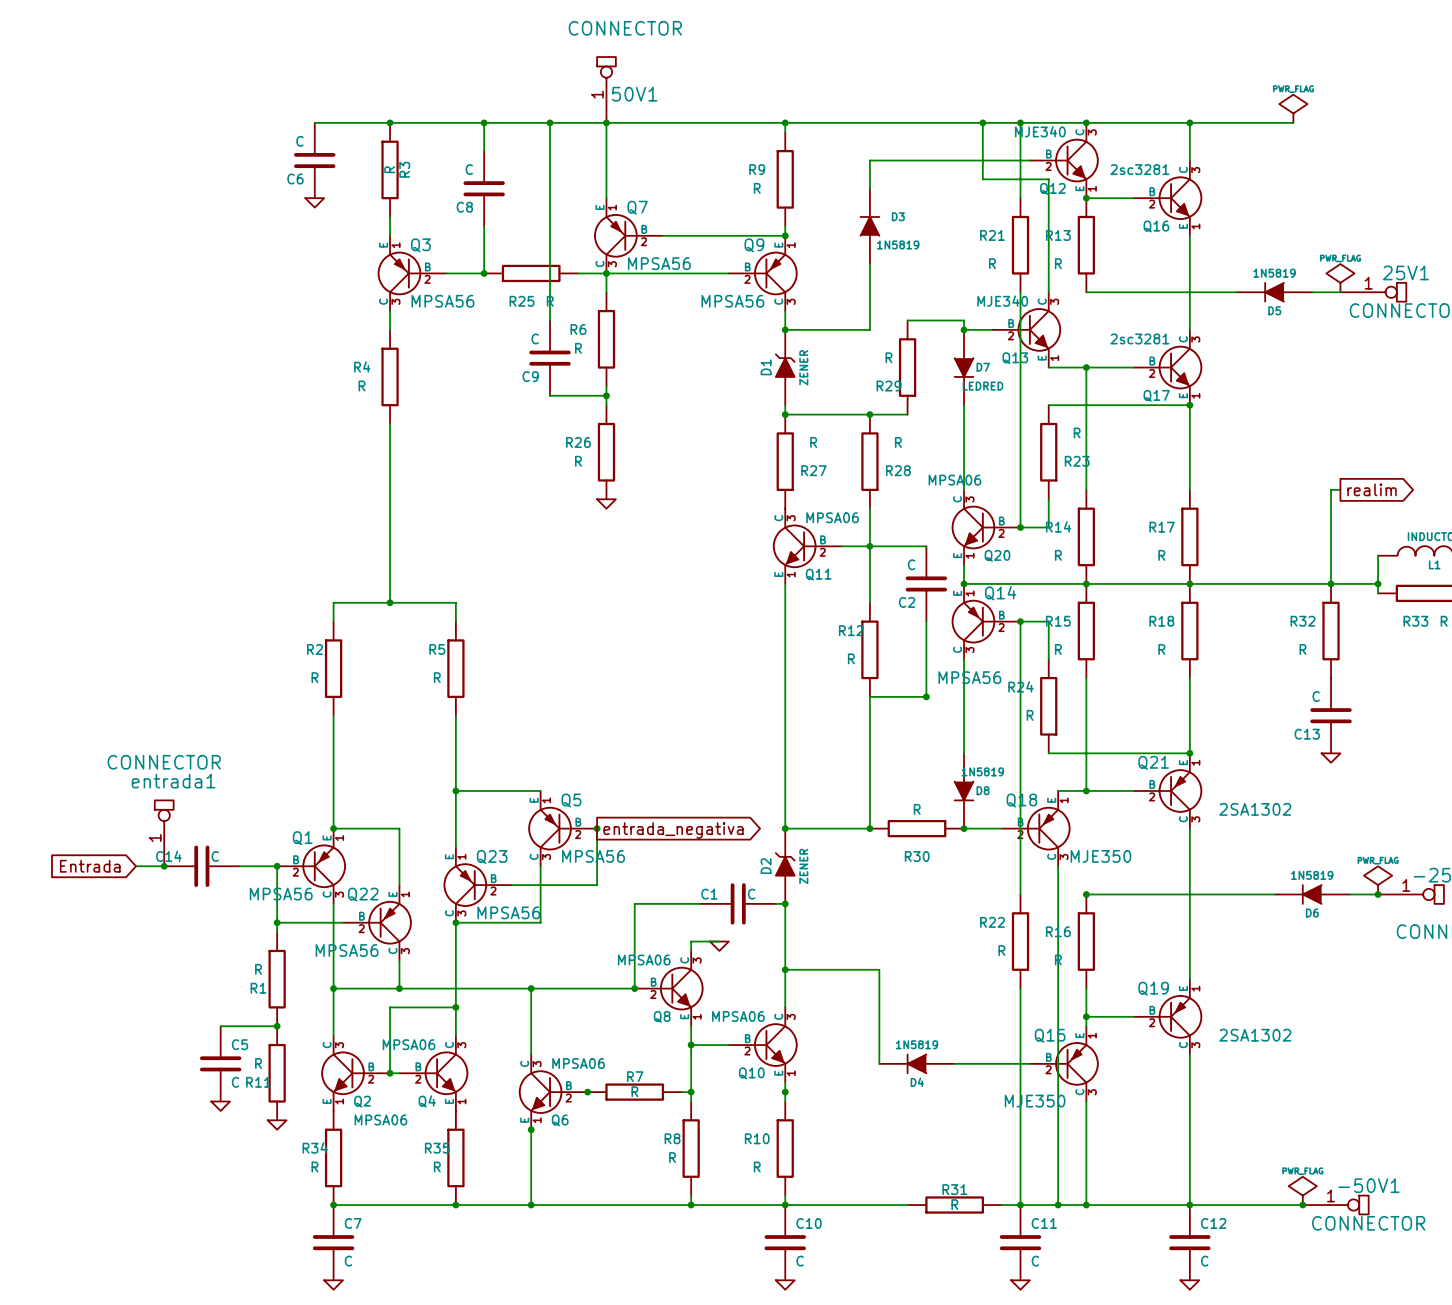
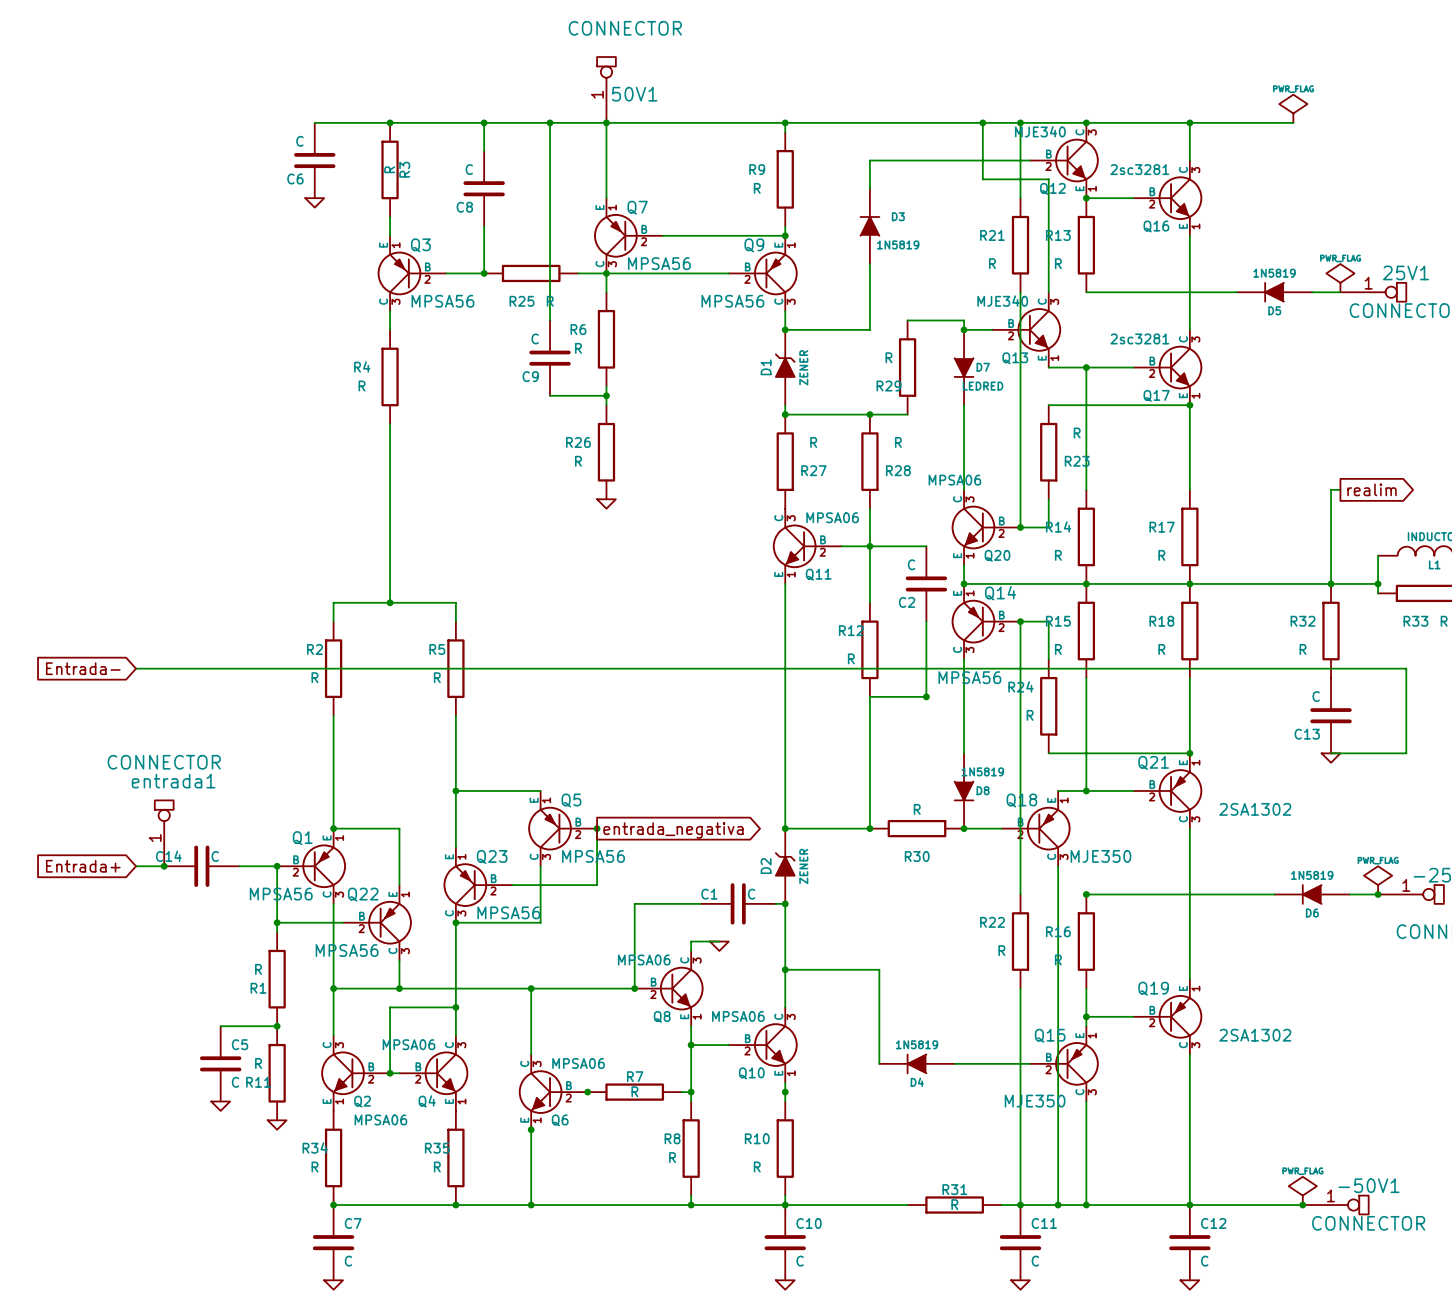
global label: none -> Entrada- (83, 668)
wire: none -> (135, 668) (1406, 668) (1406, 753) (1331, 753)
global label: Entrada (90, 866) -> Entrada+ (83, 866)

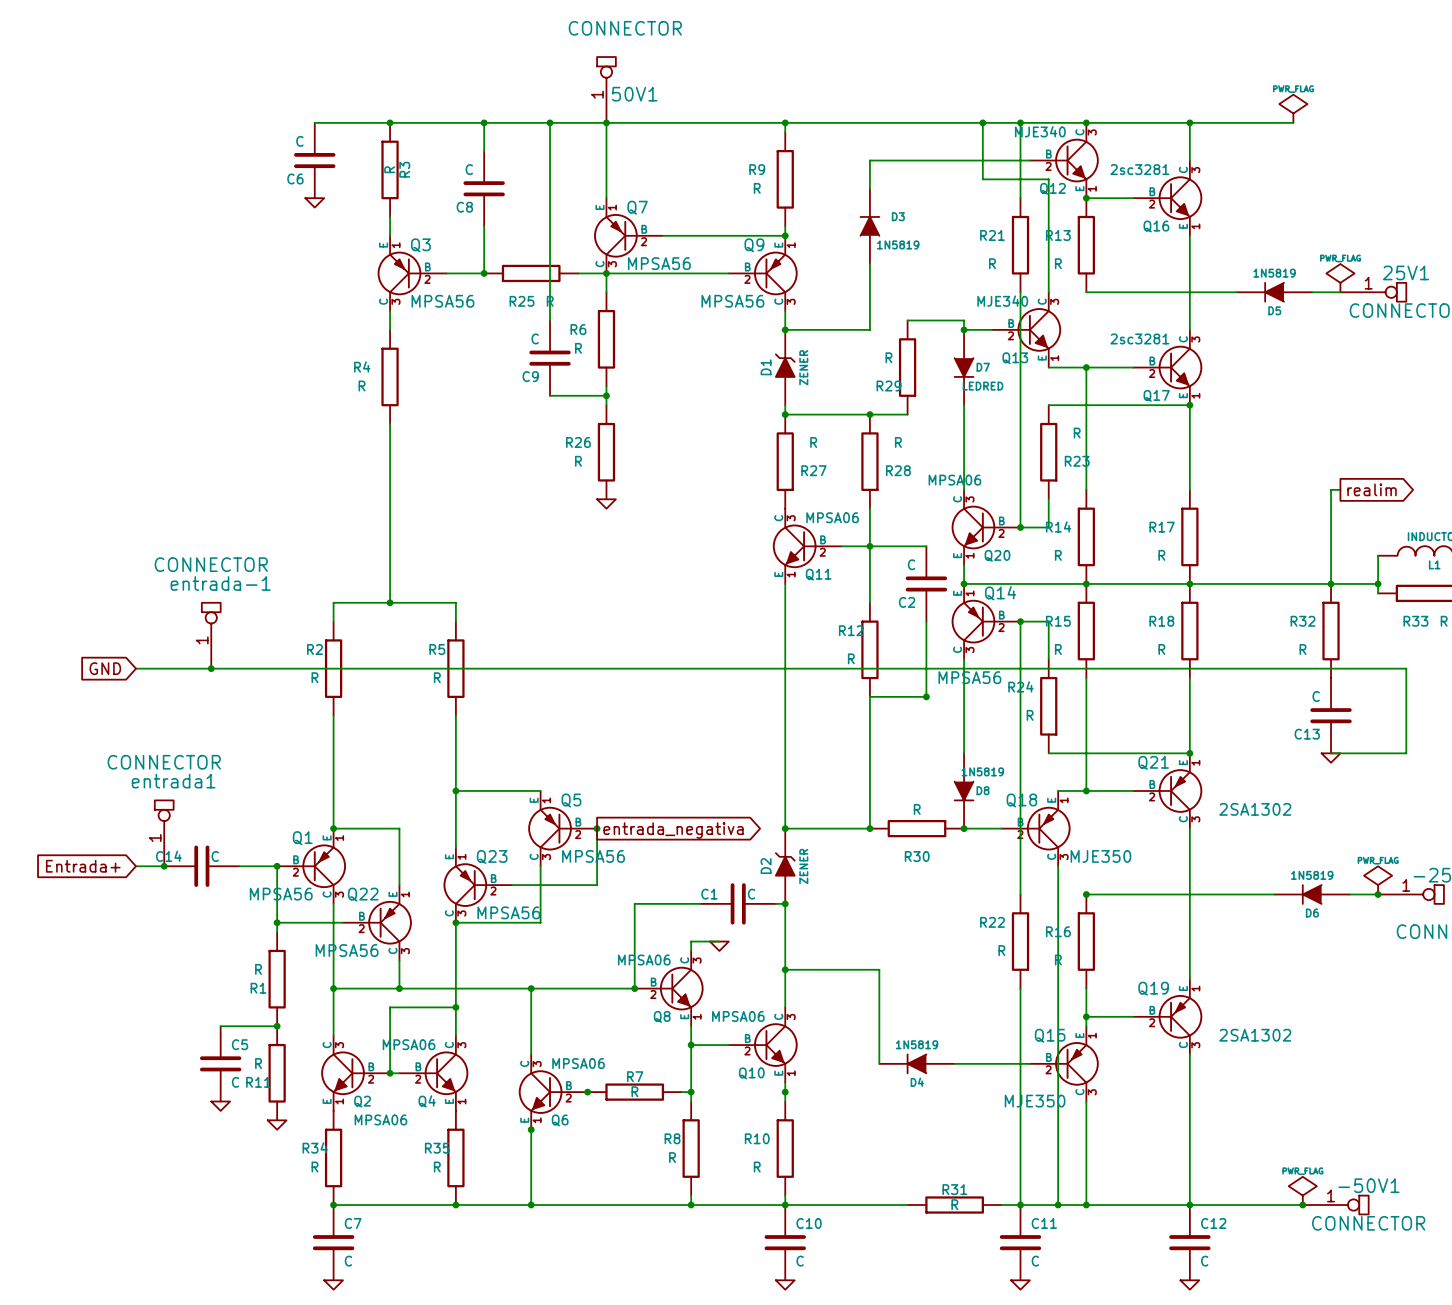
entrada-1: none -> CONNECTOR (211, 635)
global label: Entrada- (83, 668) -> GND (105, 668)
junction: none -> (211, 668)

